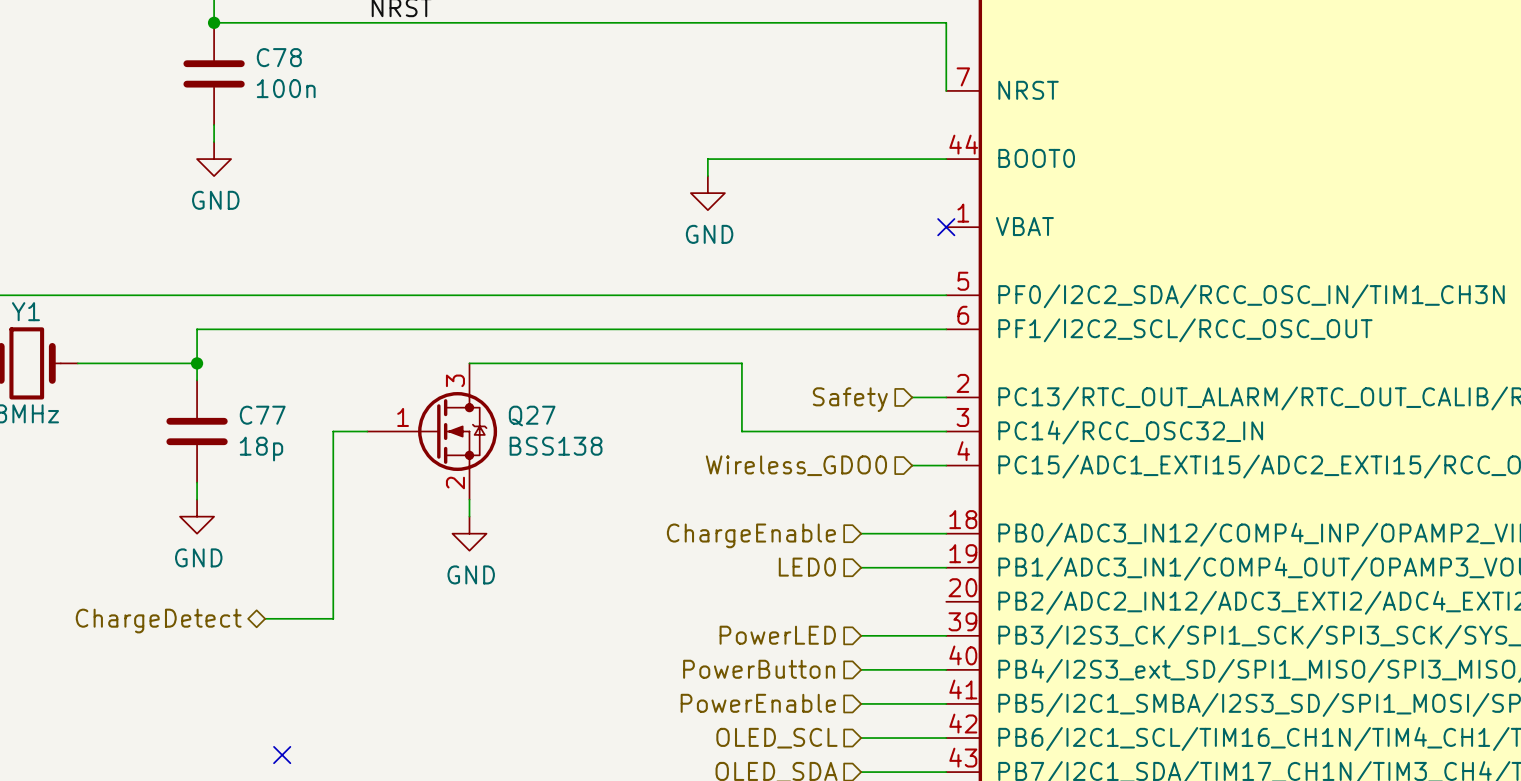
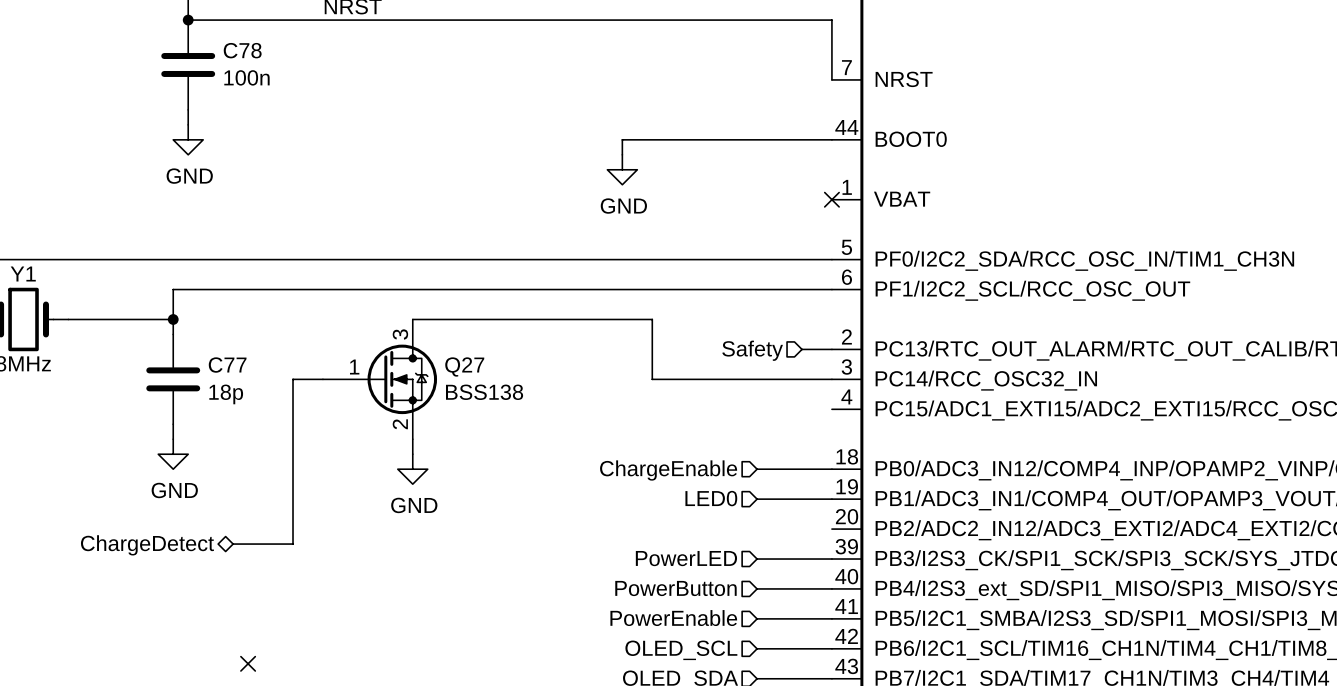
hierarchical label: Wireless_GDO0 (796, 465) -> none
wire: (912, 465) (946, 465) -> none

